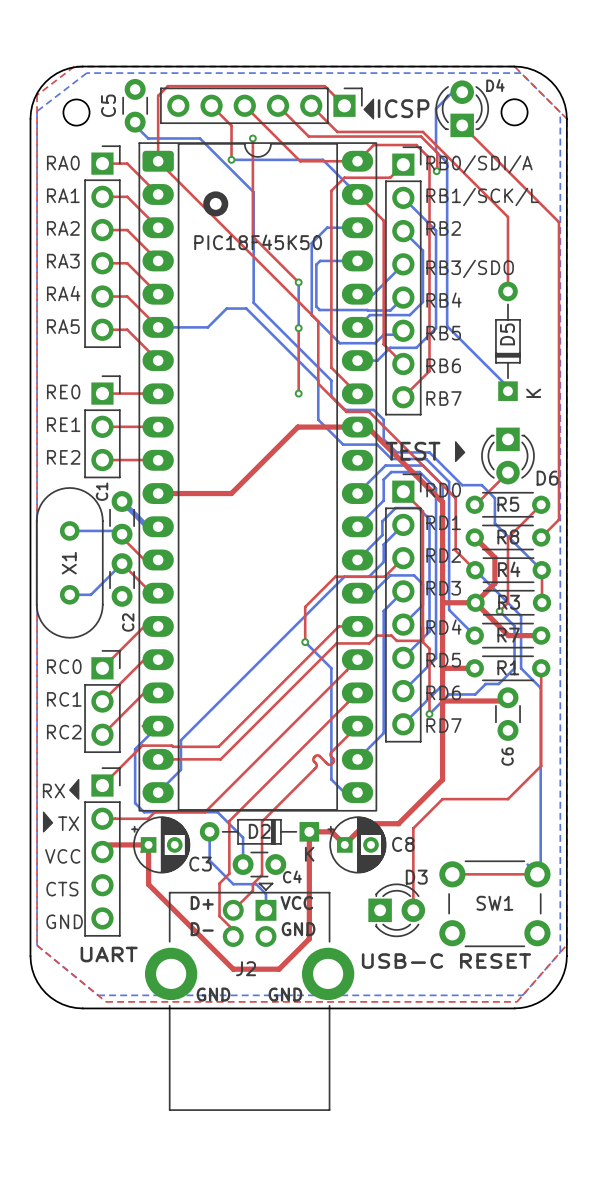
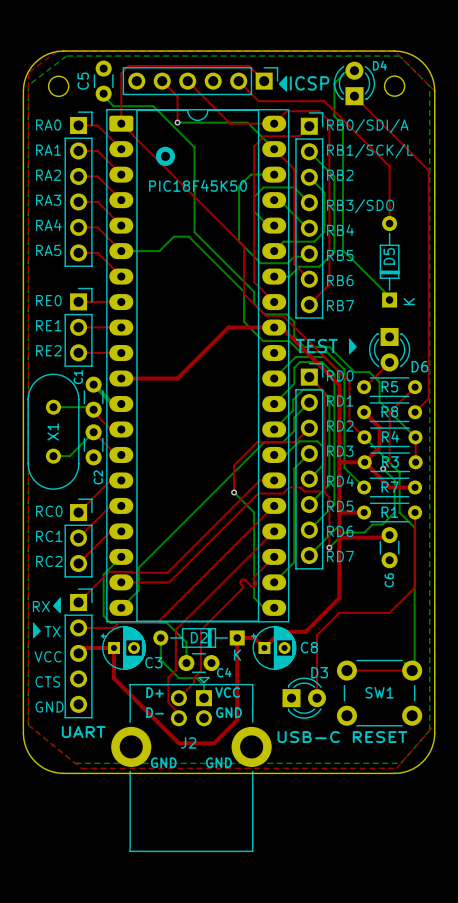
top track: (278, 105) (308, 136) (421, 136) (437, 152) (436, 171) -> none
top track: (252, 138) (252, 236) (298, 282) -> none
via: (252, 138) -> none
via: (436, 171) -> none
bottom track: (357, 260) (320, 260) (316, 264) (316, 306) (319, 310) (390, 310) (403, 297) -> none
bottom track: none -> (279, 200) (307, 228)
bottom track: (403, 264) (373, 294) (357, 294) -> (309, 202) (294, 187) (263, 187) (254, 197) (254, 211) (268, 225)
bottom track: (298, 282) (298, 328) -> none
via: (298, 282) -> none
top track: (298, 328) (298, 393) -> none
via: (298, 328) -> none
via: (298, 393) -> none

